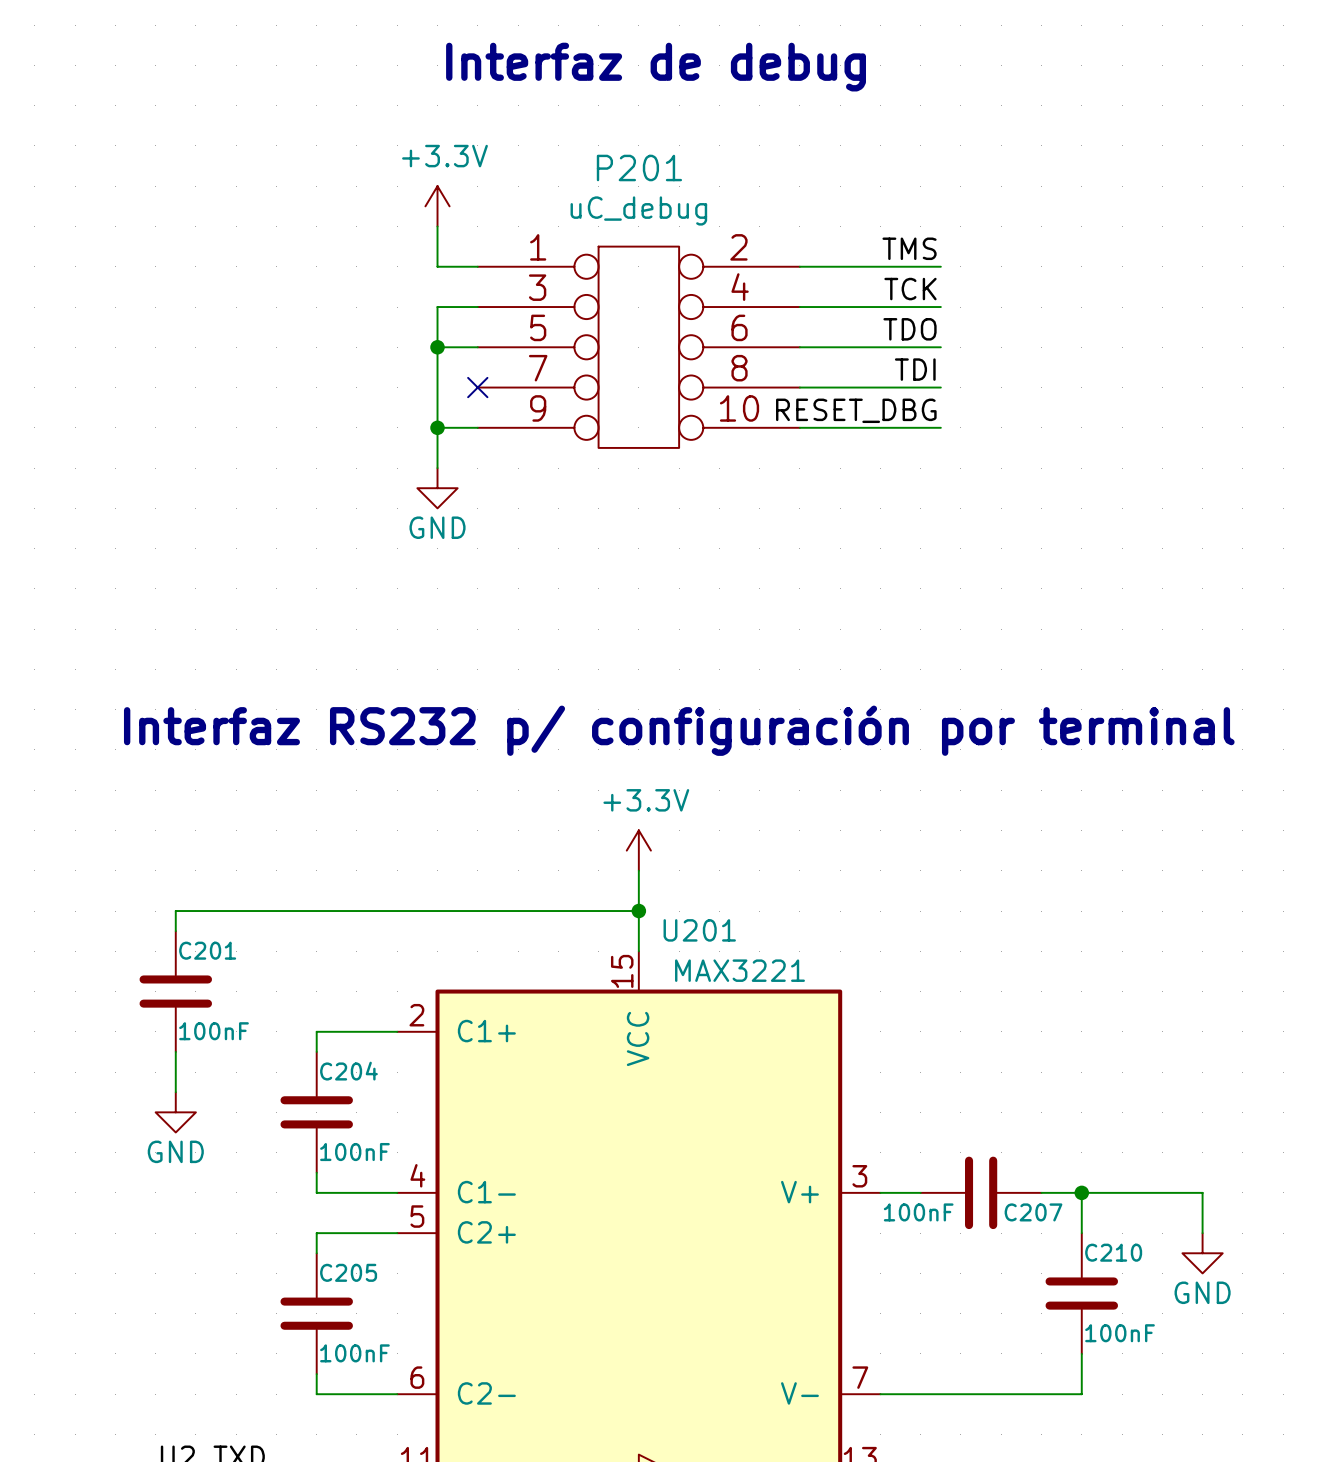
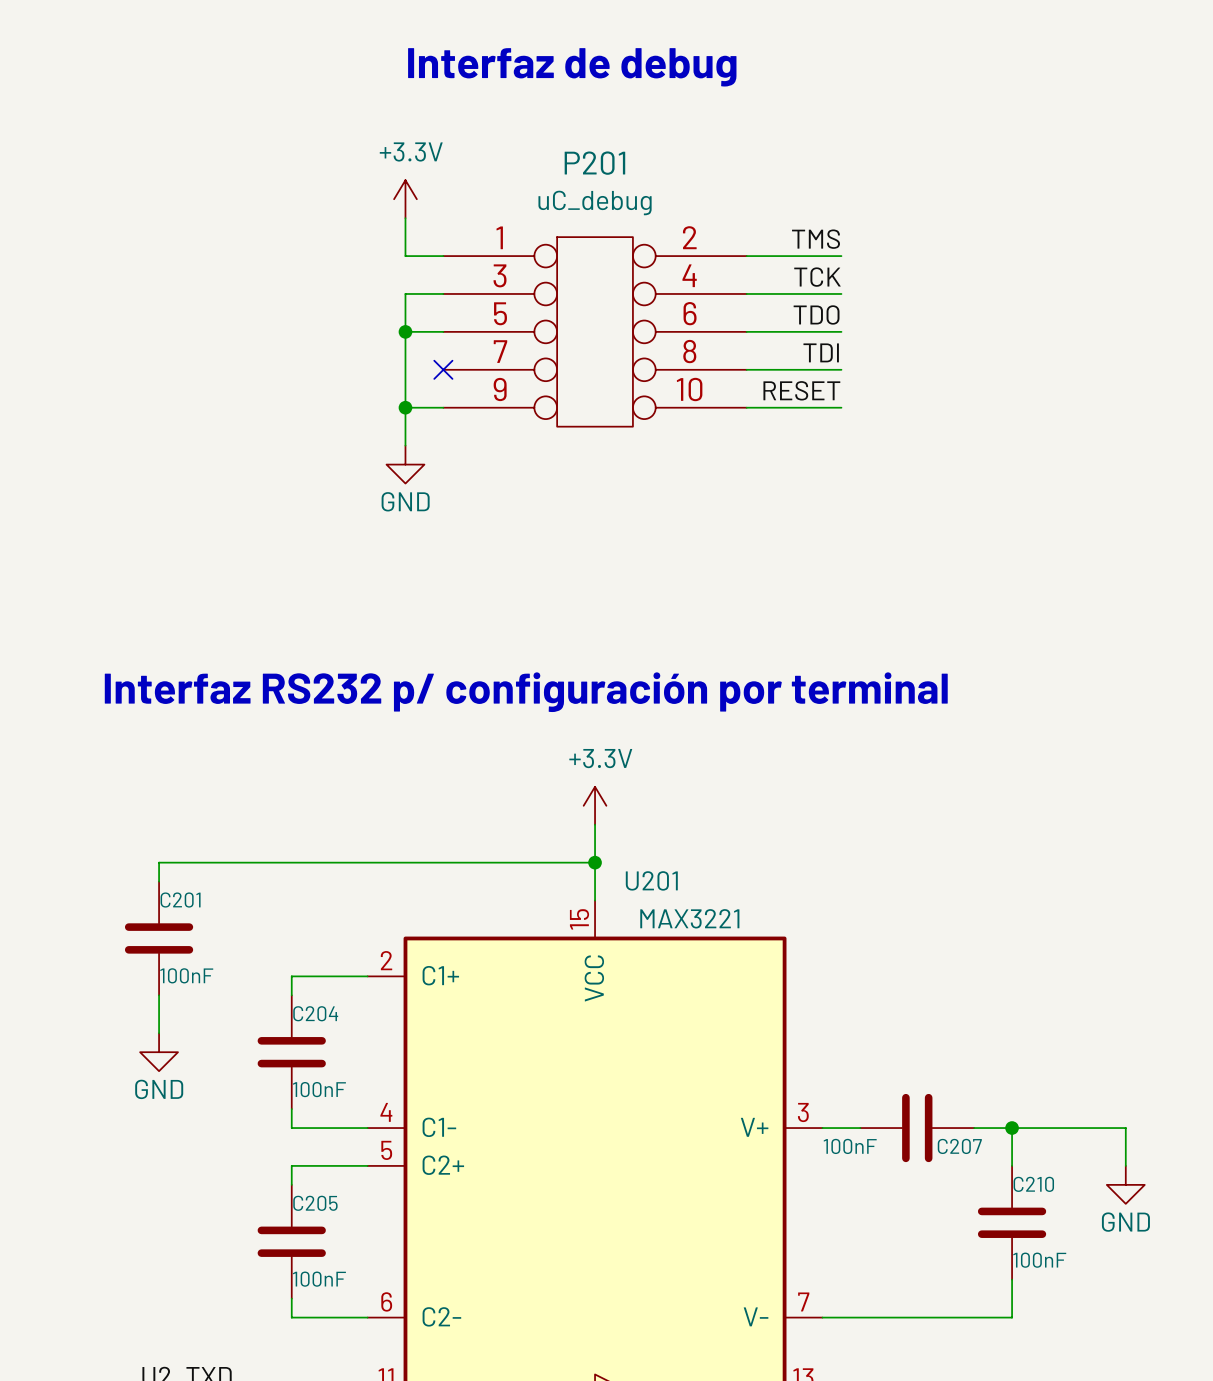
label position: TMS (909, 248) -> TMS (816, 239)
wire: (900, 266) (940, 266) -> none
label position: TCK (910, 289) -> TCK (817, 277)
wire: (900, 307) (940, 307) -> none
label position: TDO (910, 329) -> TDO (816, 314)
wire: (900, 347) (940, 347) -> none
label position: TDI (915, 369) -> TDI (821, 352)
wire: (900, 387) (940, 387) -> none
label: RESET_DBG (856, 410) -> RESET (801, 390)
wire: (900, 427) (940, 427) -> none

